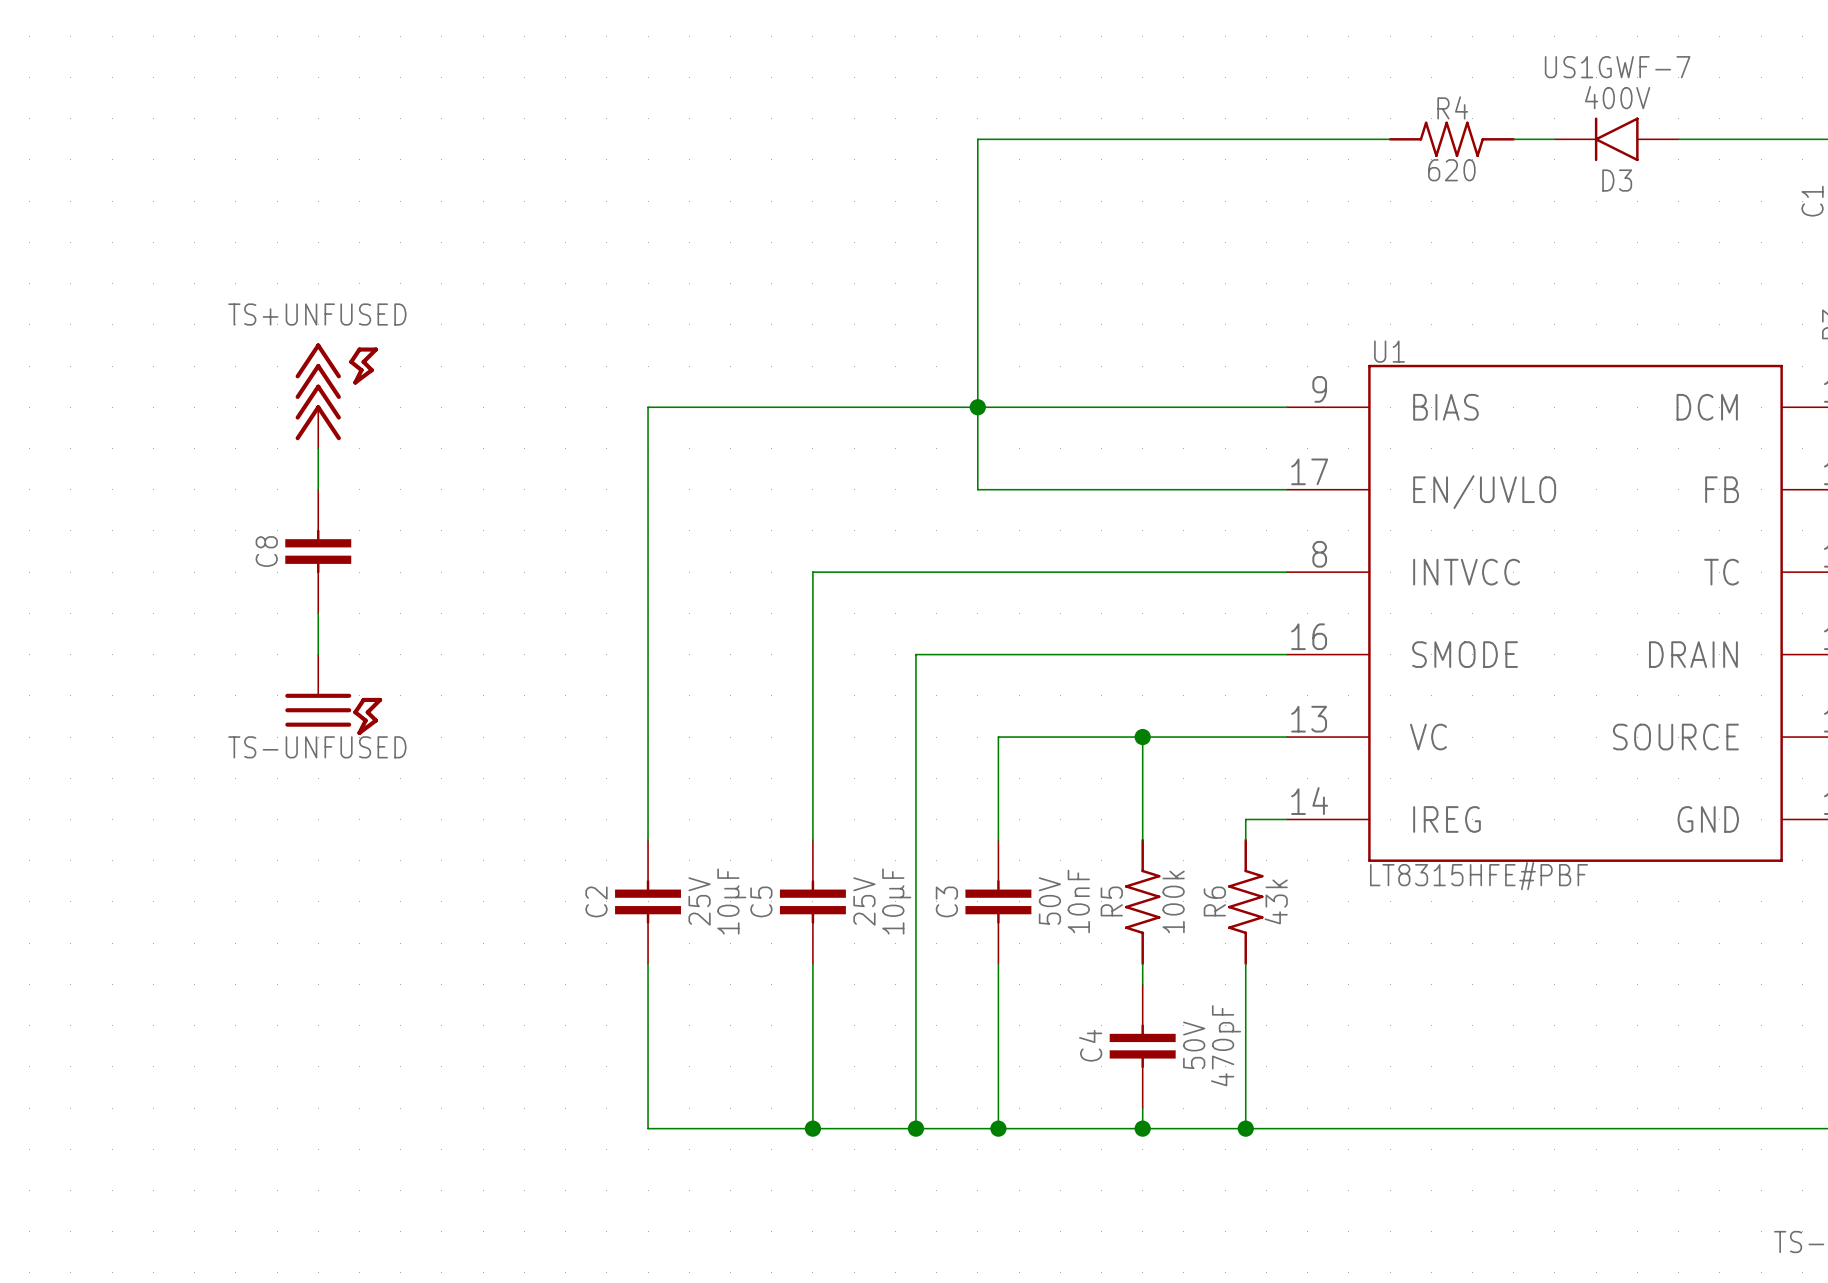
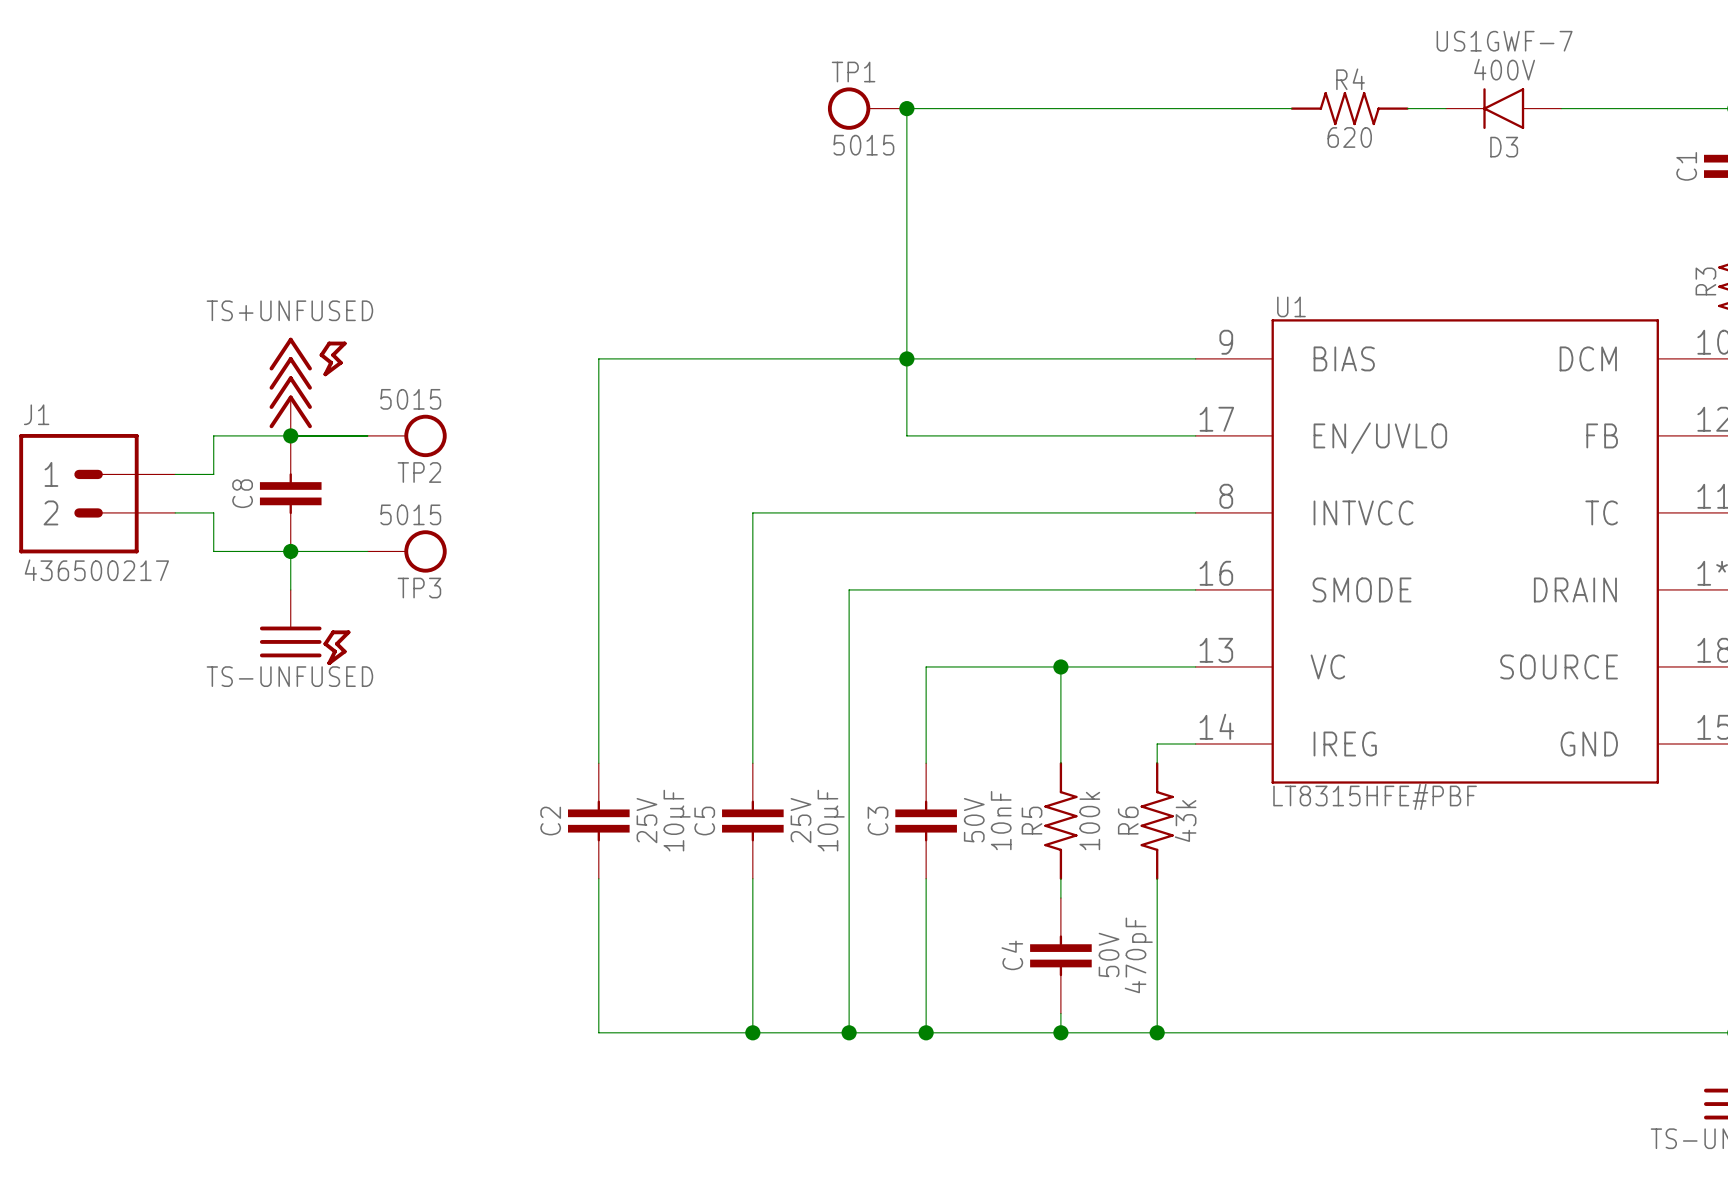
TP1: none -> (867, 108)
junction: none -> (906, 108)
power symbol position: TS+UNFUSED (336, 395) -> TS+UNFUSED (308, 386)
junction: none -> (290, 435)
wire: none -> (367, 435) (213, 435) (213, 474) (175, 474)
TP2: none -> (407, 435)
J1: none -> (97, 493)
wire: none -> (175, 512) (213, 512) (213, 551) (367, 551)
junction: none -> (290, 551)
TP3: none -> (407, 551)

